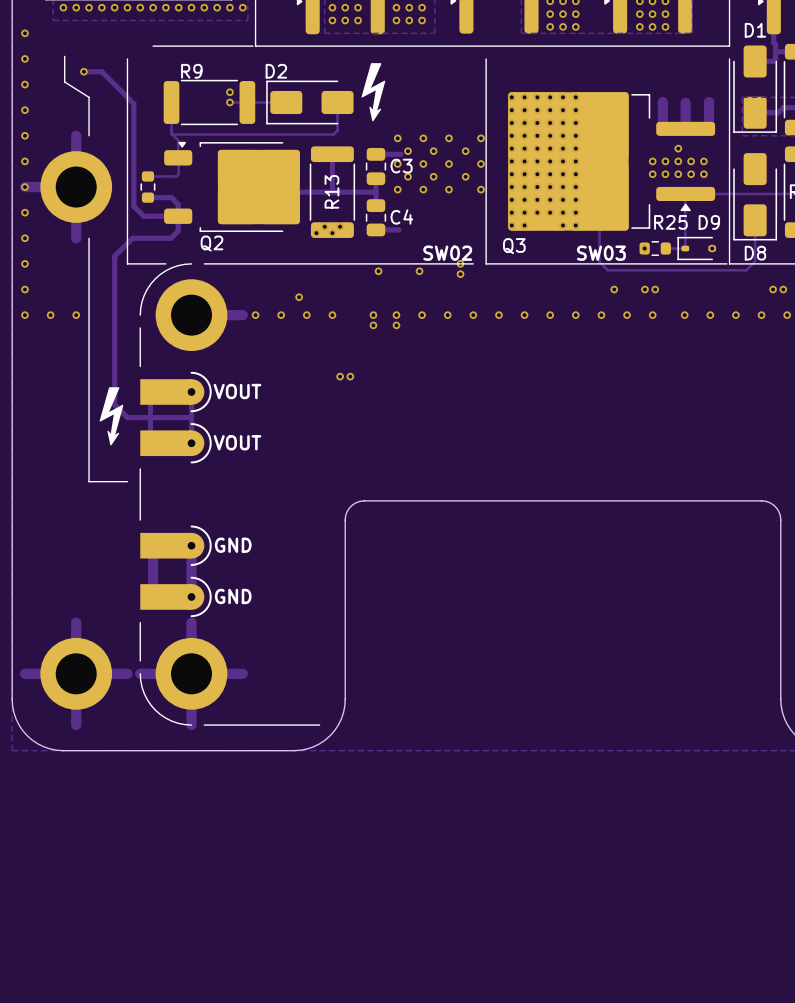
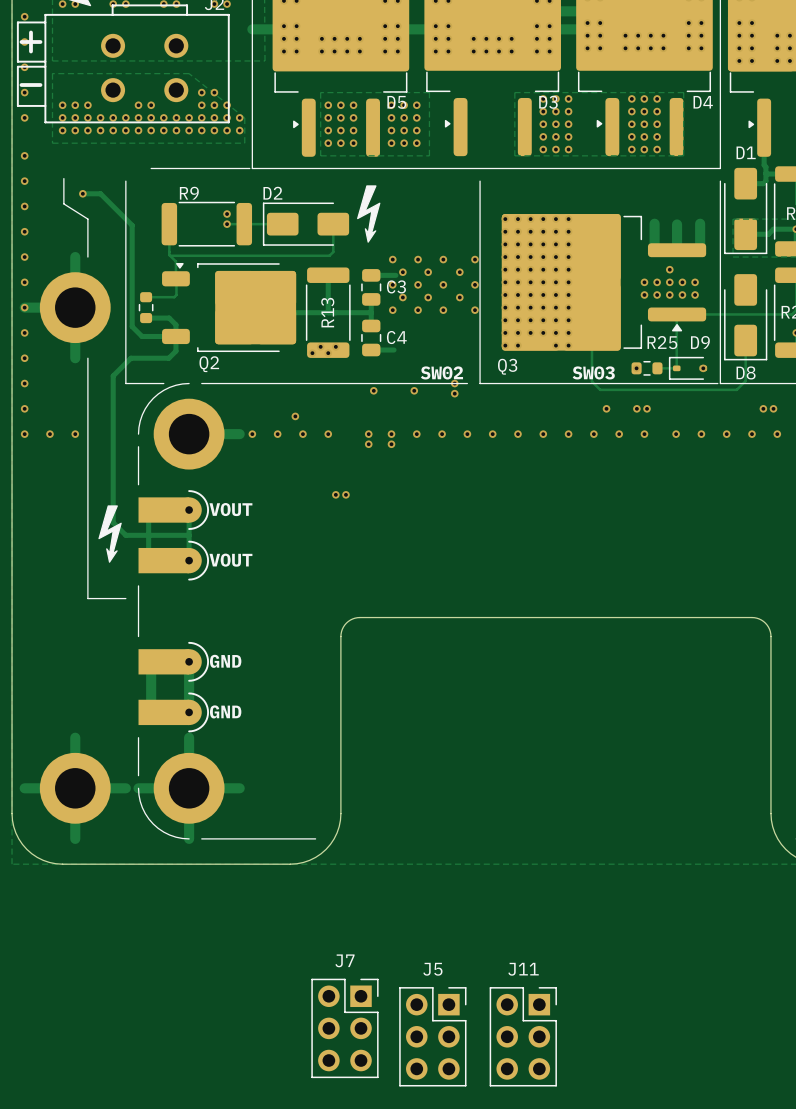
J7: none -> (344, 1028)
J5: none -> (432, 1036)
J11: none -> (523, 1036)

